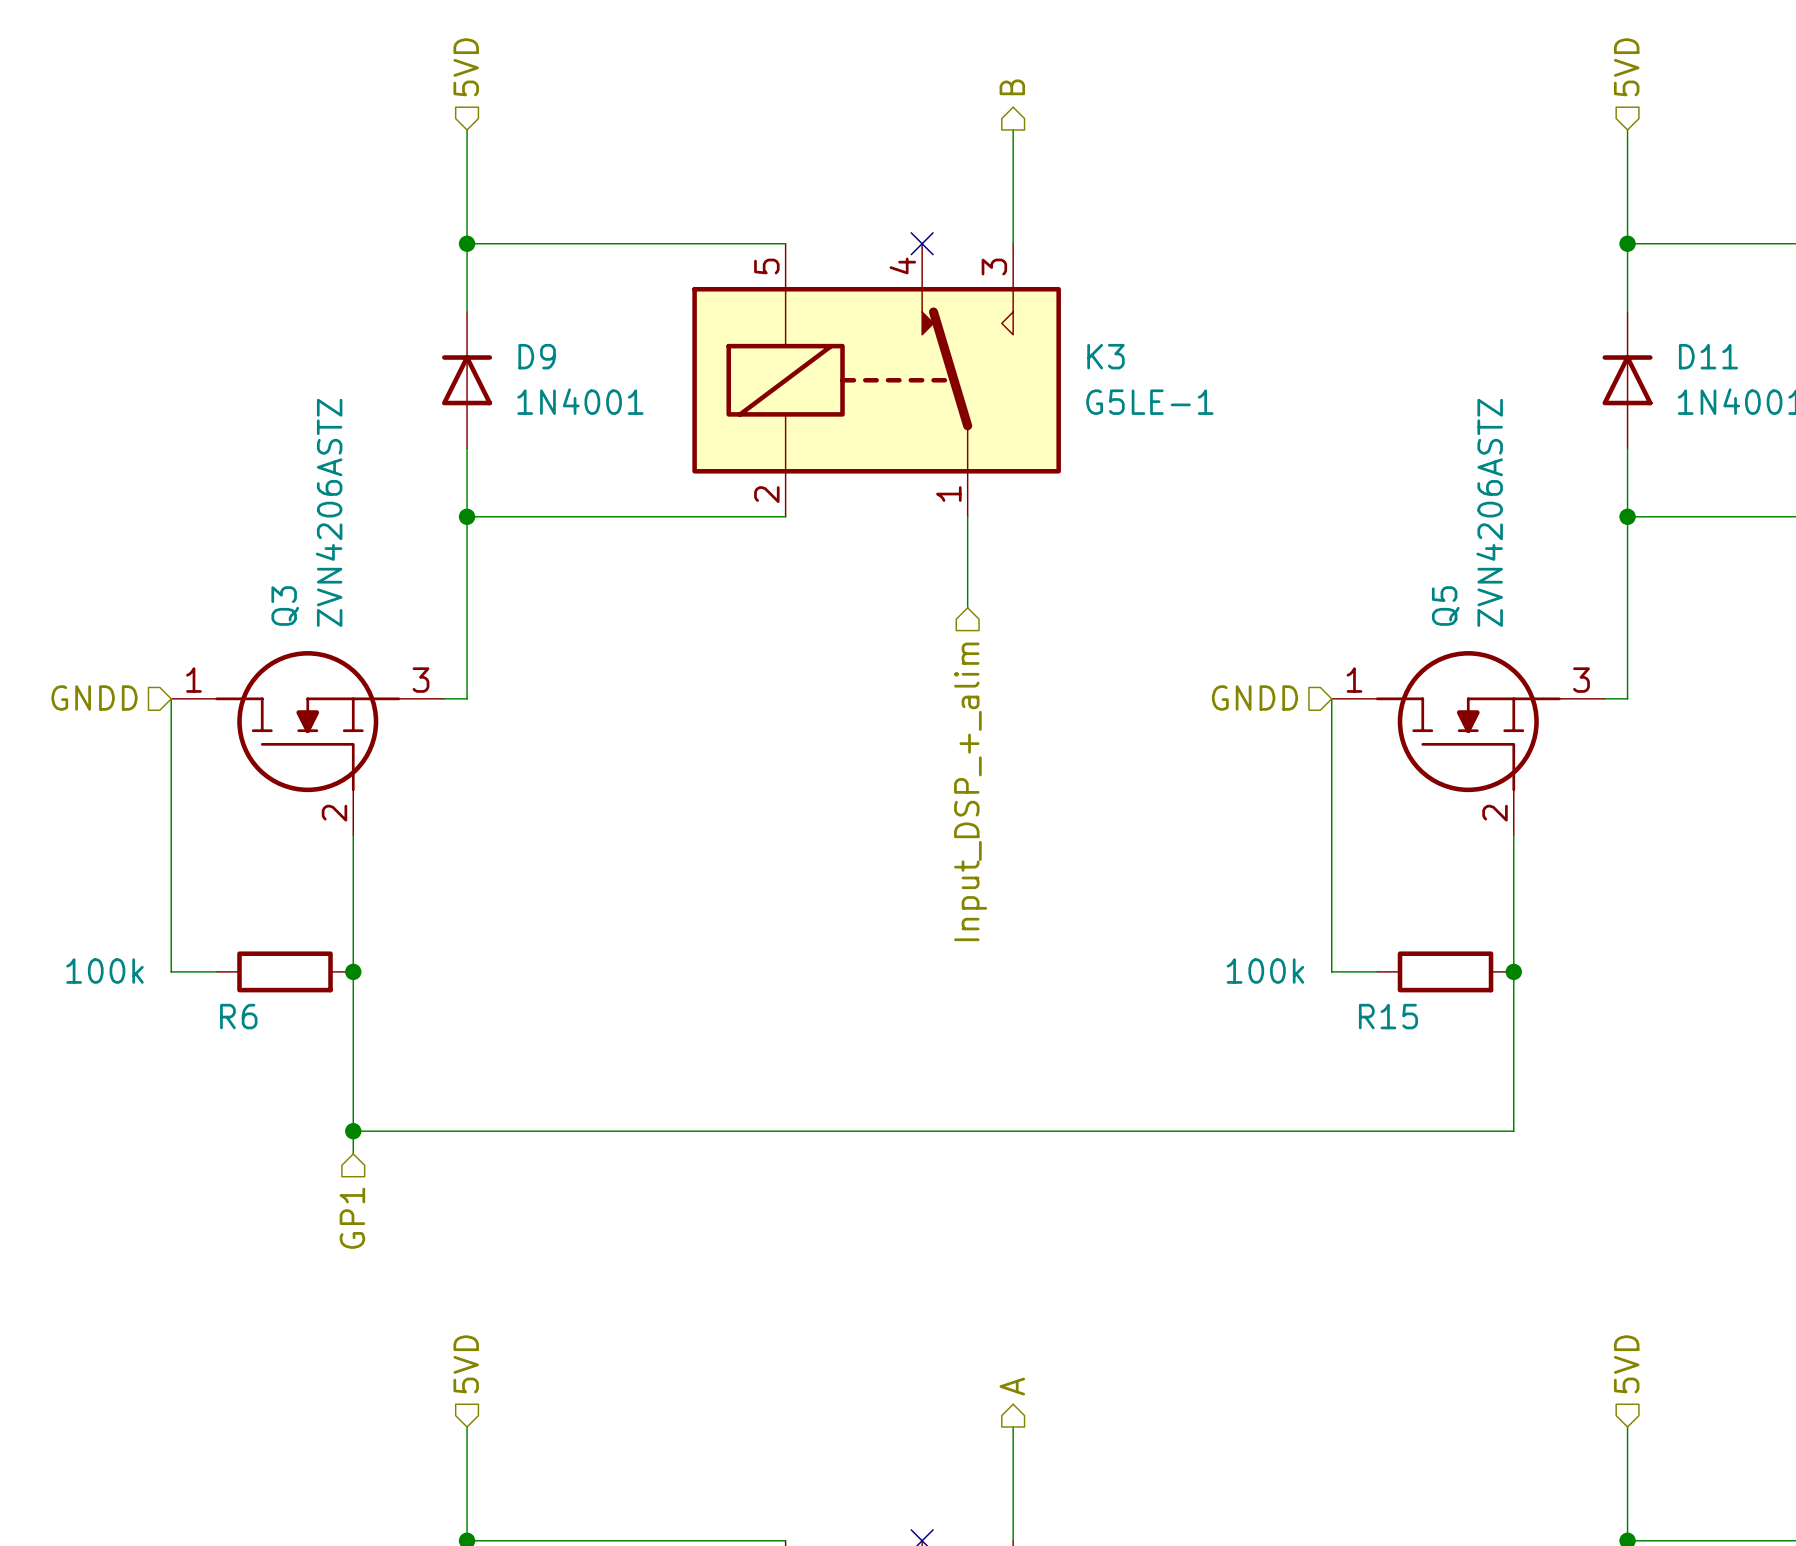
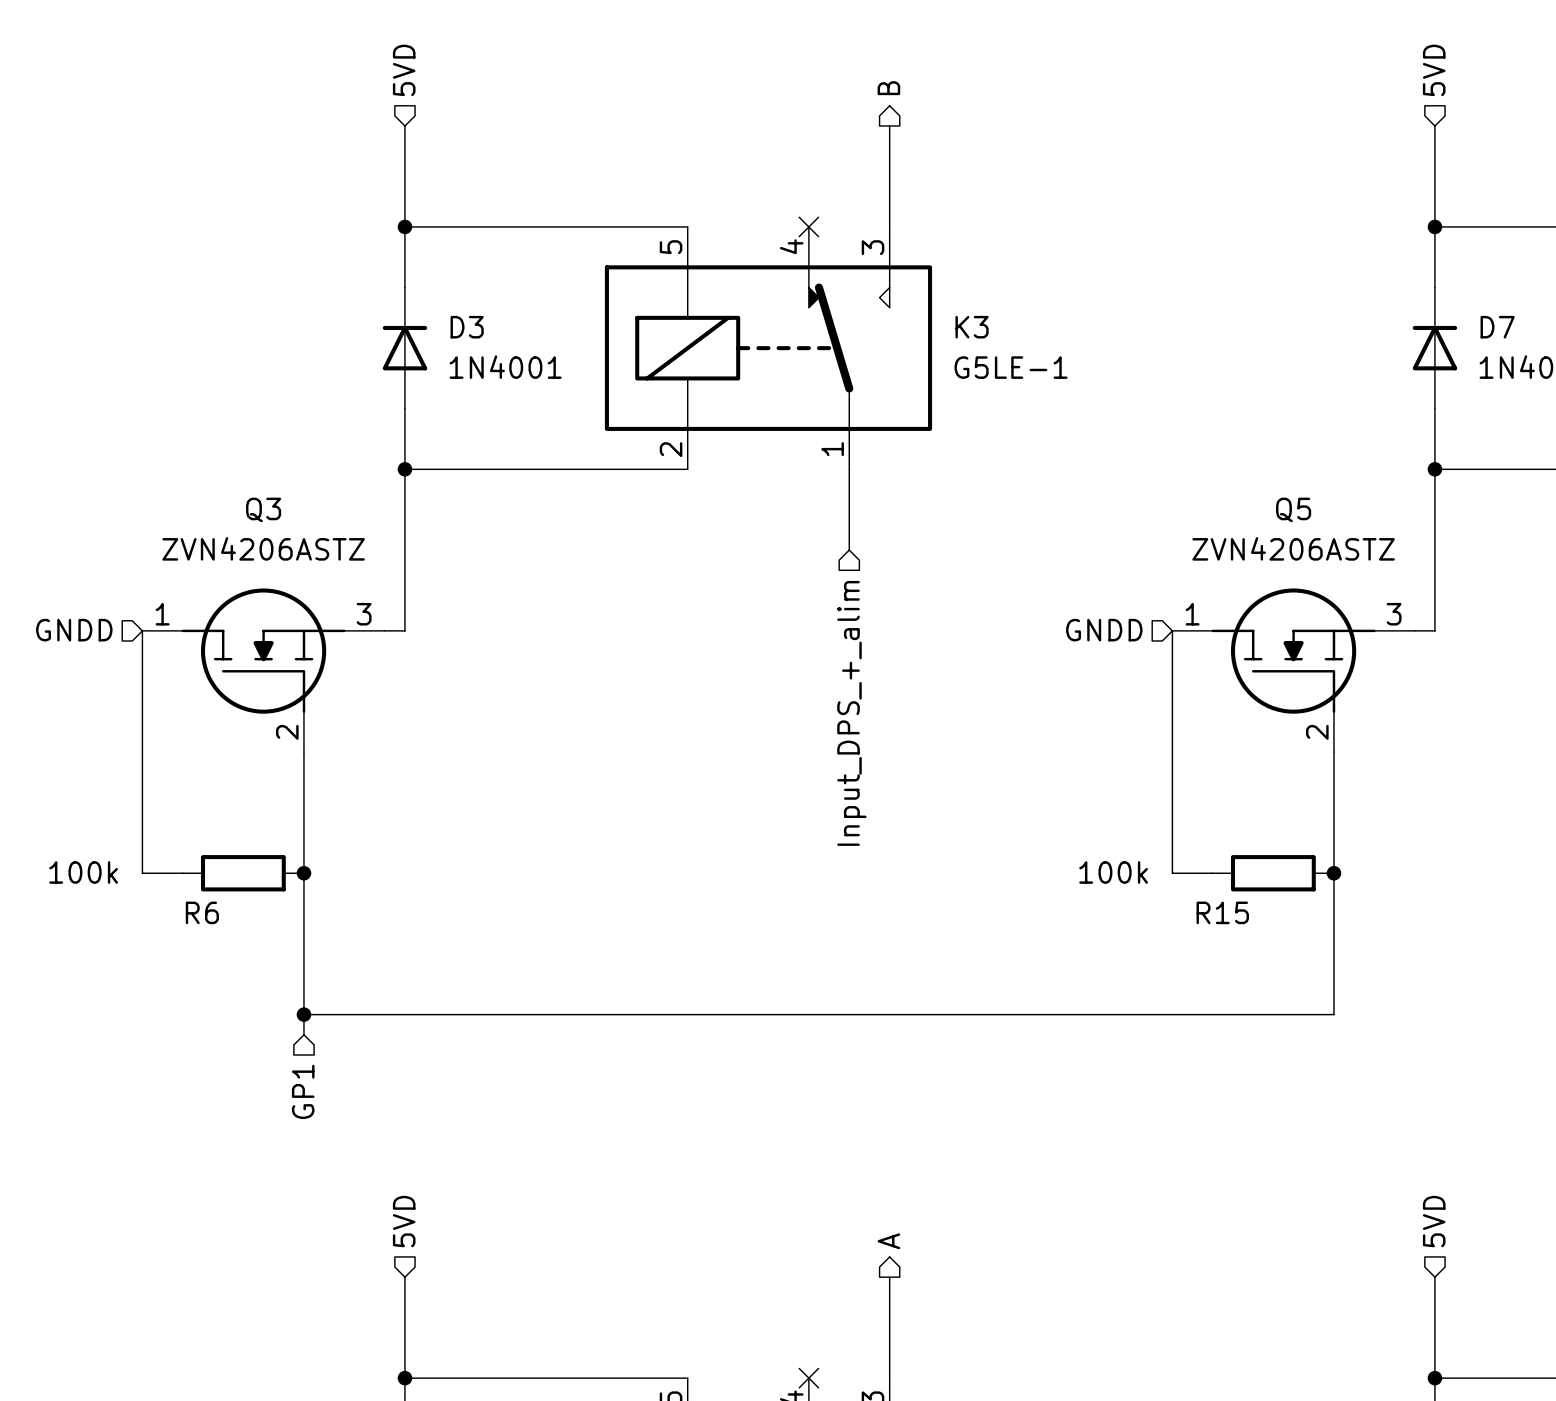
D9 name: D9 (537, 356) -> D3 (467, 327)
D11 name: D11 (1708, 356) -> D7 (1497, 327)
Q3 value rotation: 0° (329, 512) -> 90° clockwise (263, 548)
Q5 value rotation: 0° (1489, 512) -> 90° clockwise (1293, 548)
Q3 name rotation: 0° (285, 606) -> 90° clockwise (263, 509)
Q5 name rotation: 0° (1445, 606) -> 90° clockwise (1293, 509)
hierarchical label: Input_DSP_+_alim (970, 791) -> Input_DPS_+_alim (851, 713)

